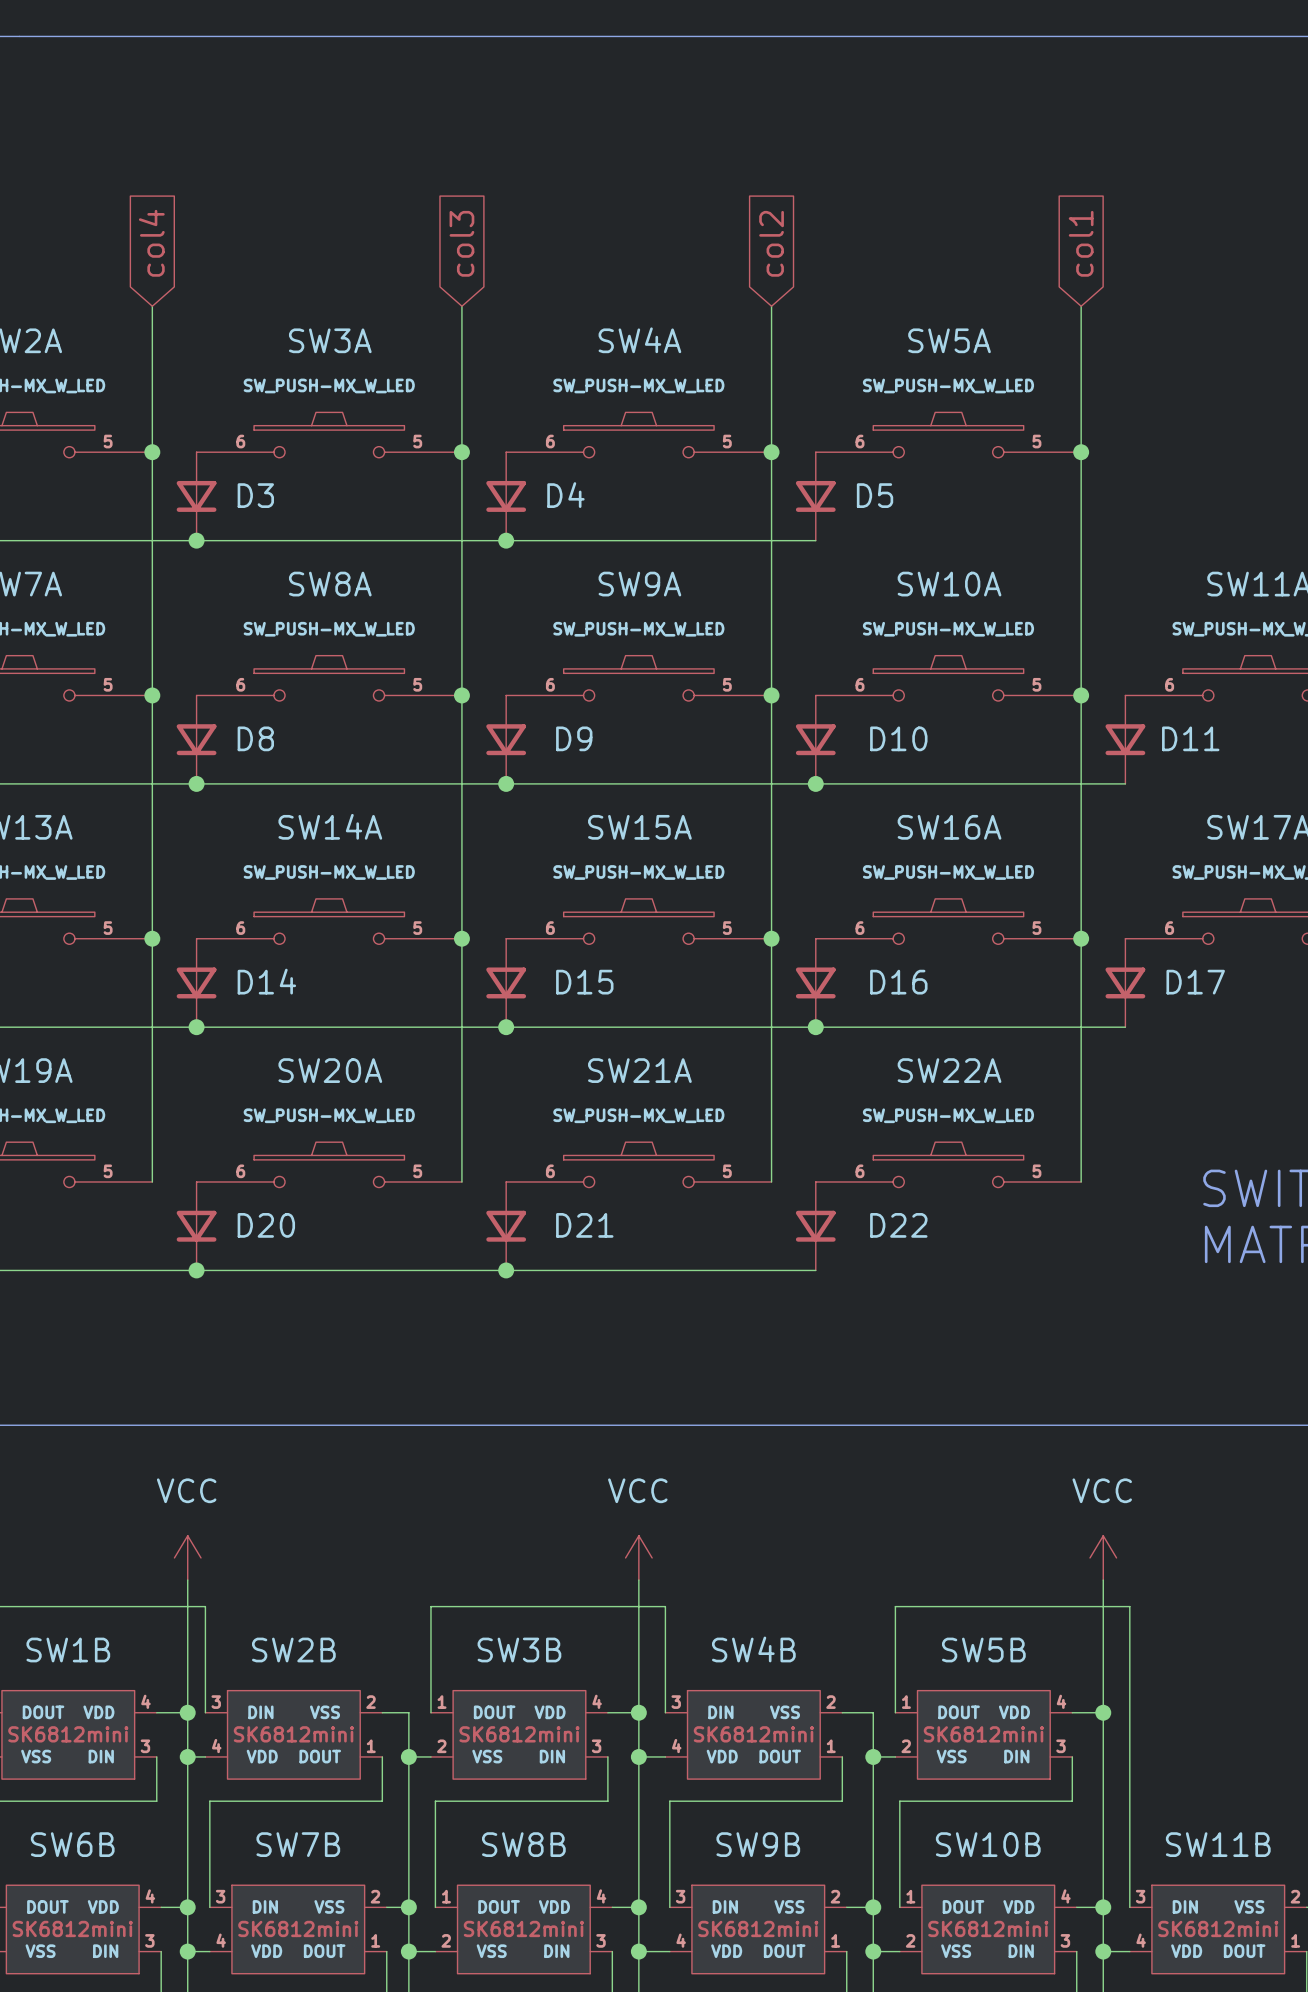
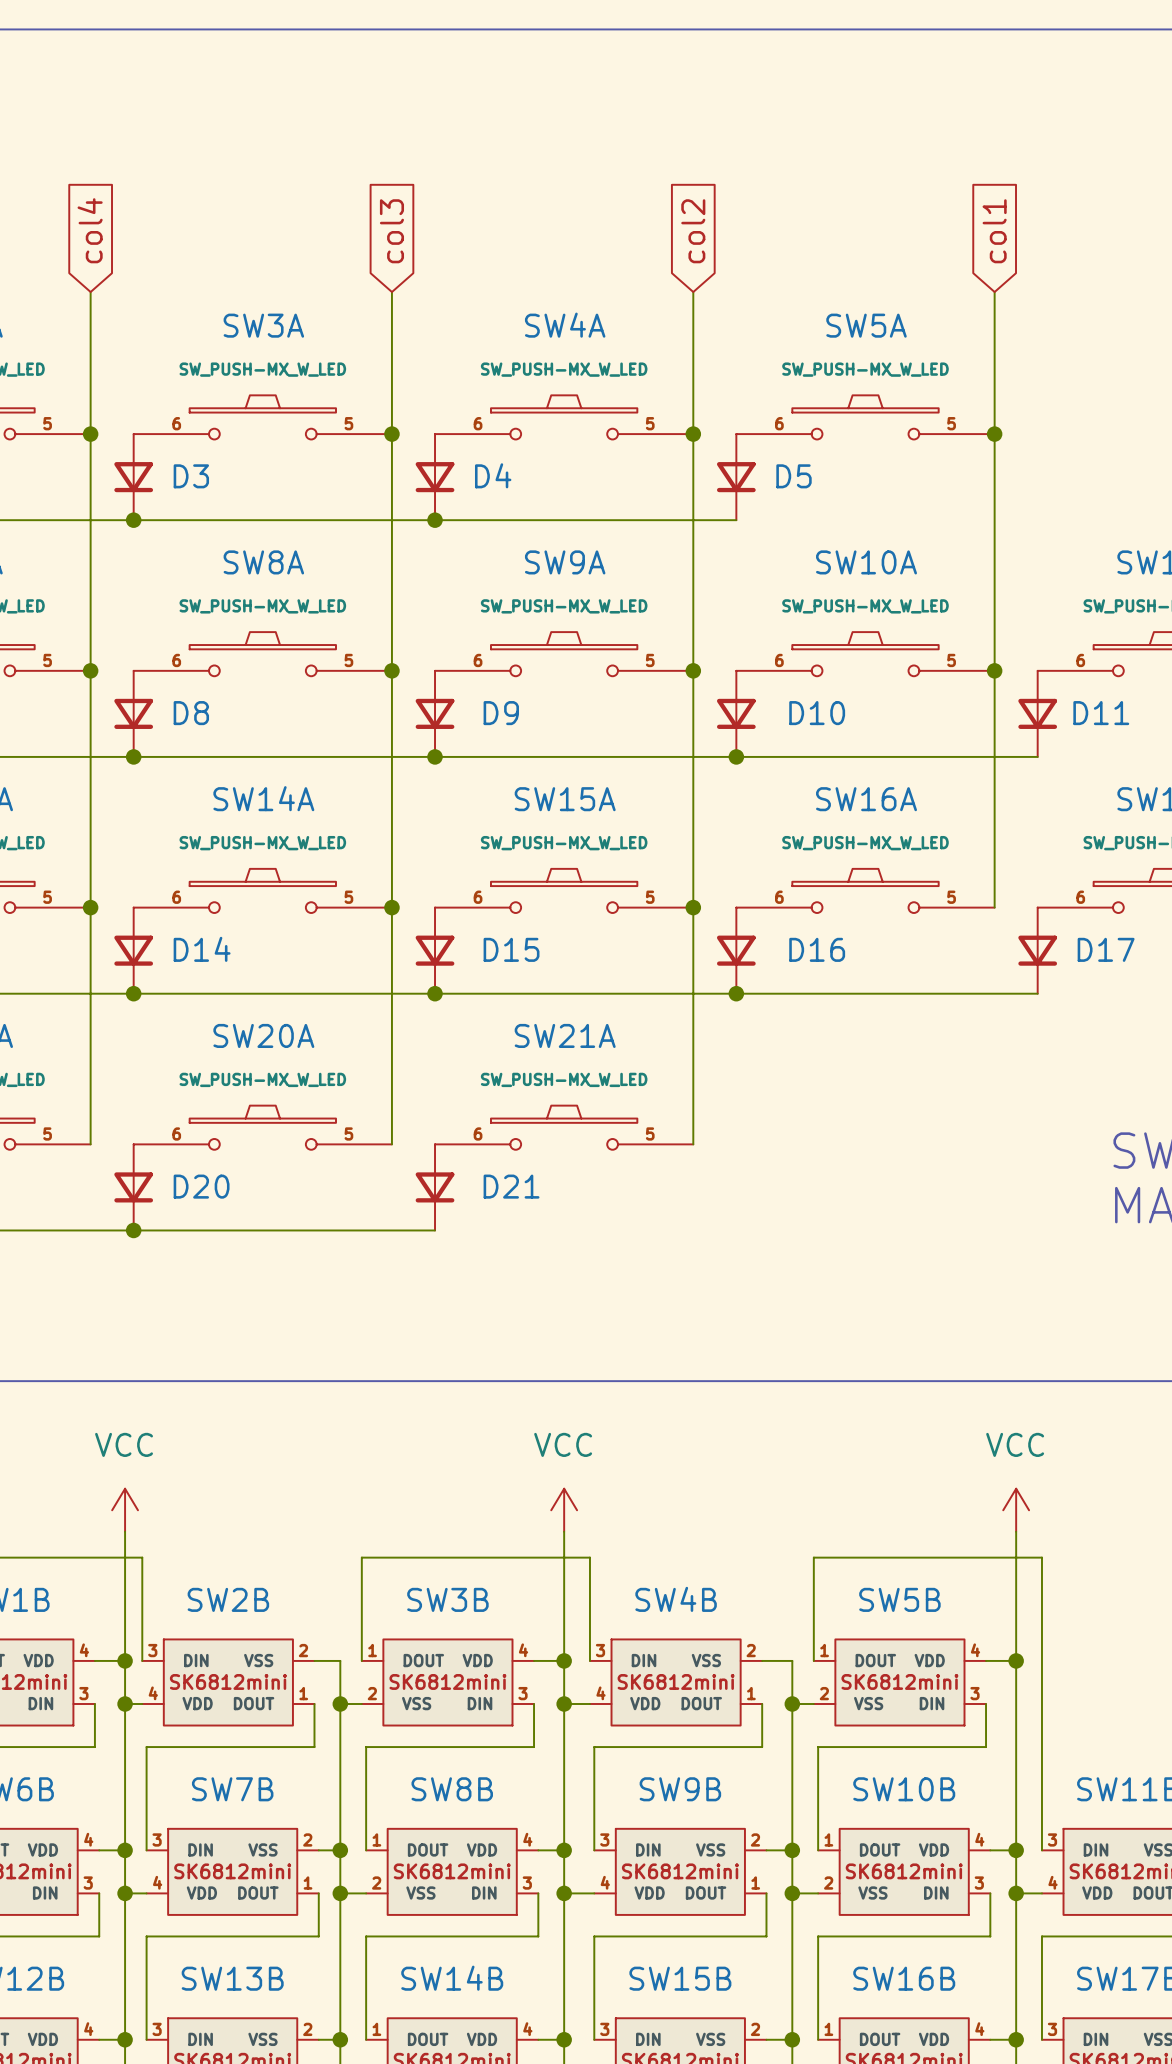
wire: (1081, 938) (1081, 1181) -> none
junction: (1081, 938) -> none
SW22A: SW_PUSH-MX_W_LED (948, 1164) -> none
D22: (815, 1226) -> none
wire: (506, 1270) (815, 1270) -> none
junction: (506, 1270) -> none

